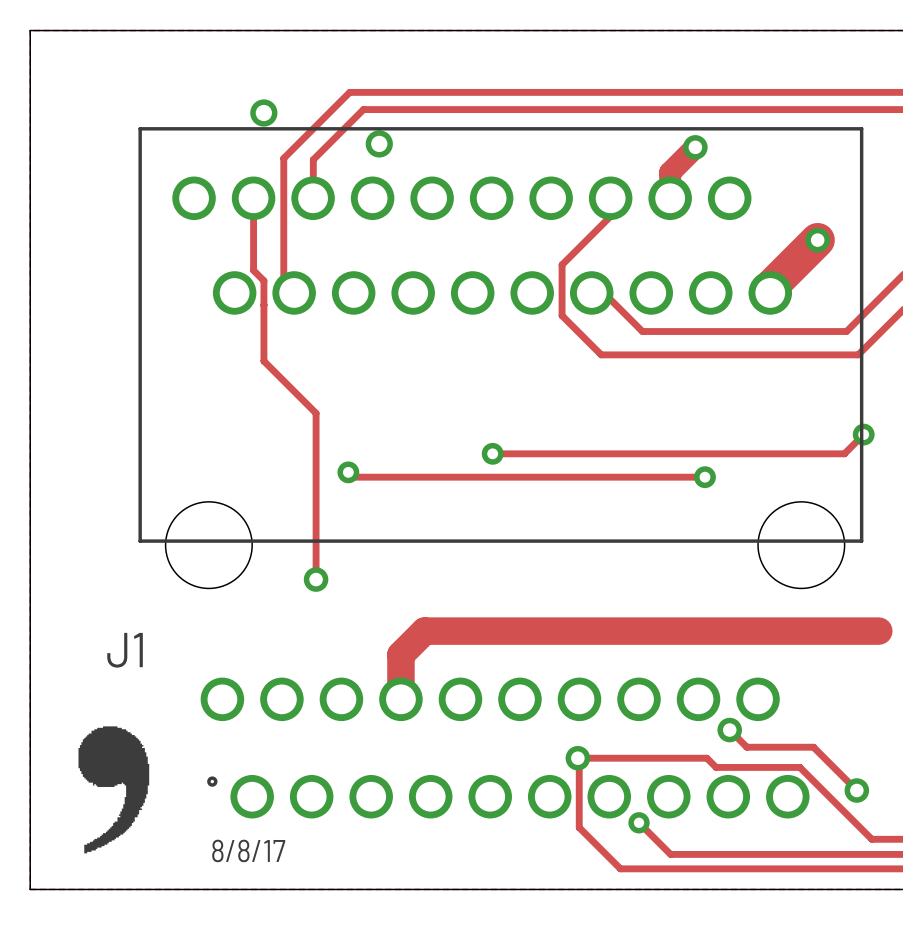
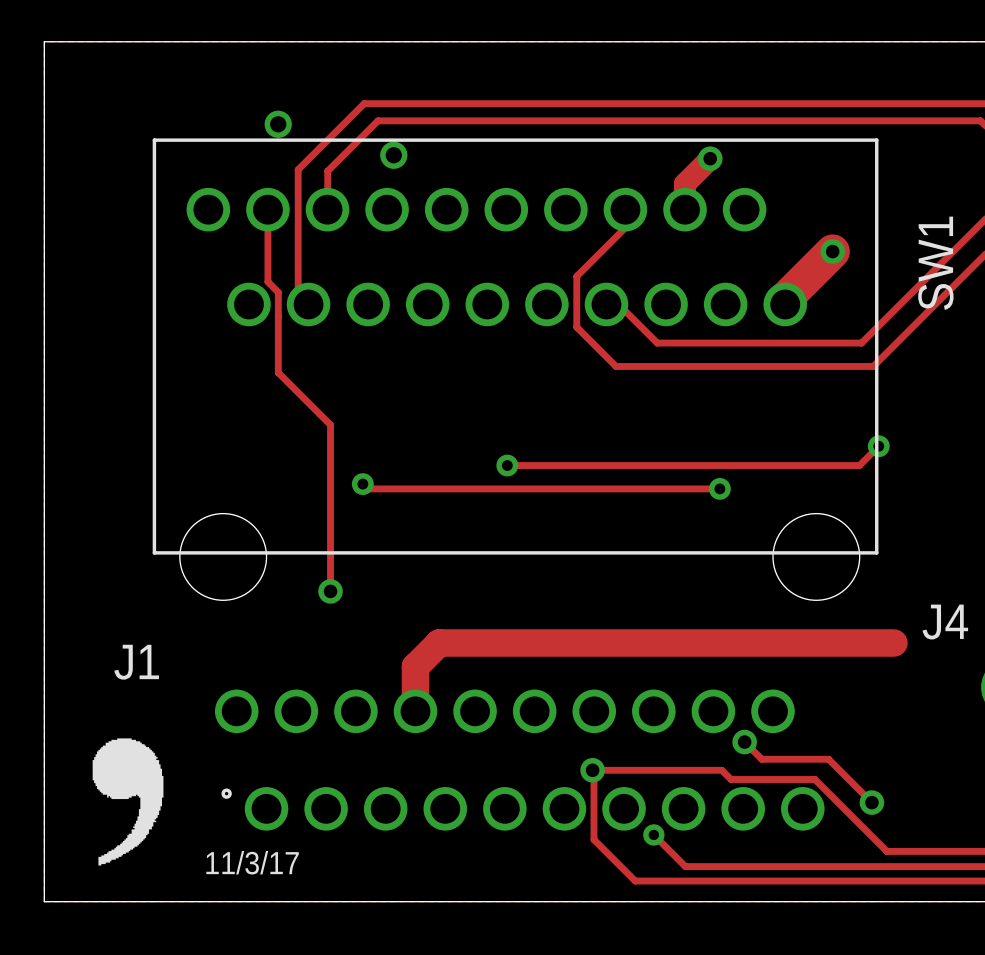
text: 8/8/17 (248, 850) -> 11/3/17 (252, 862)

